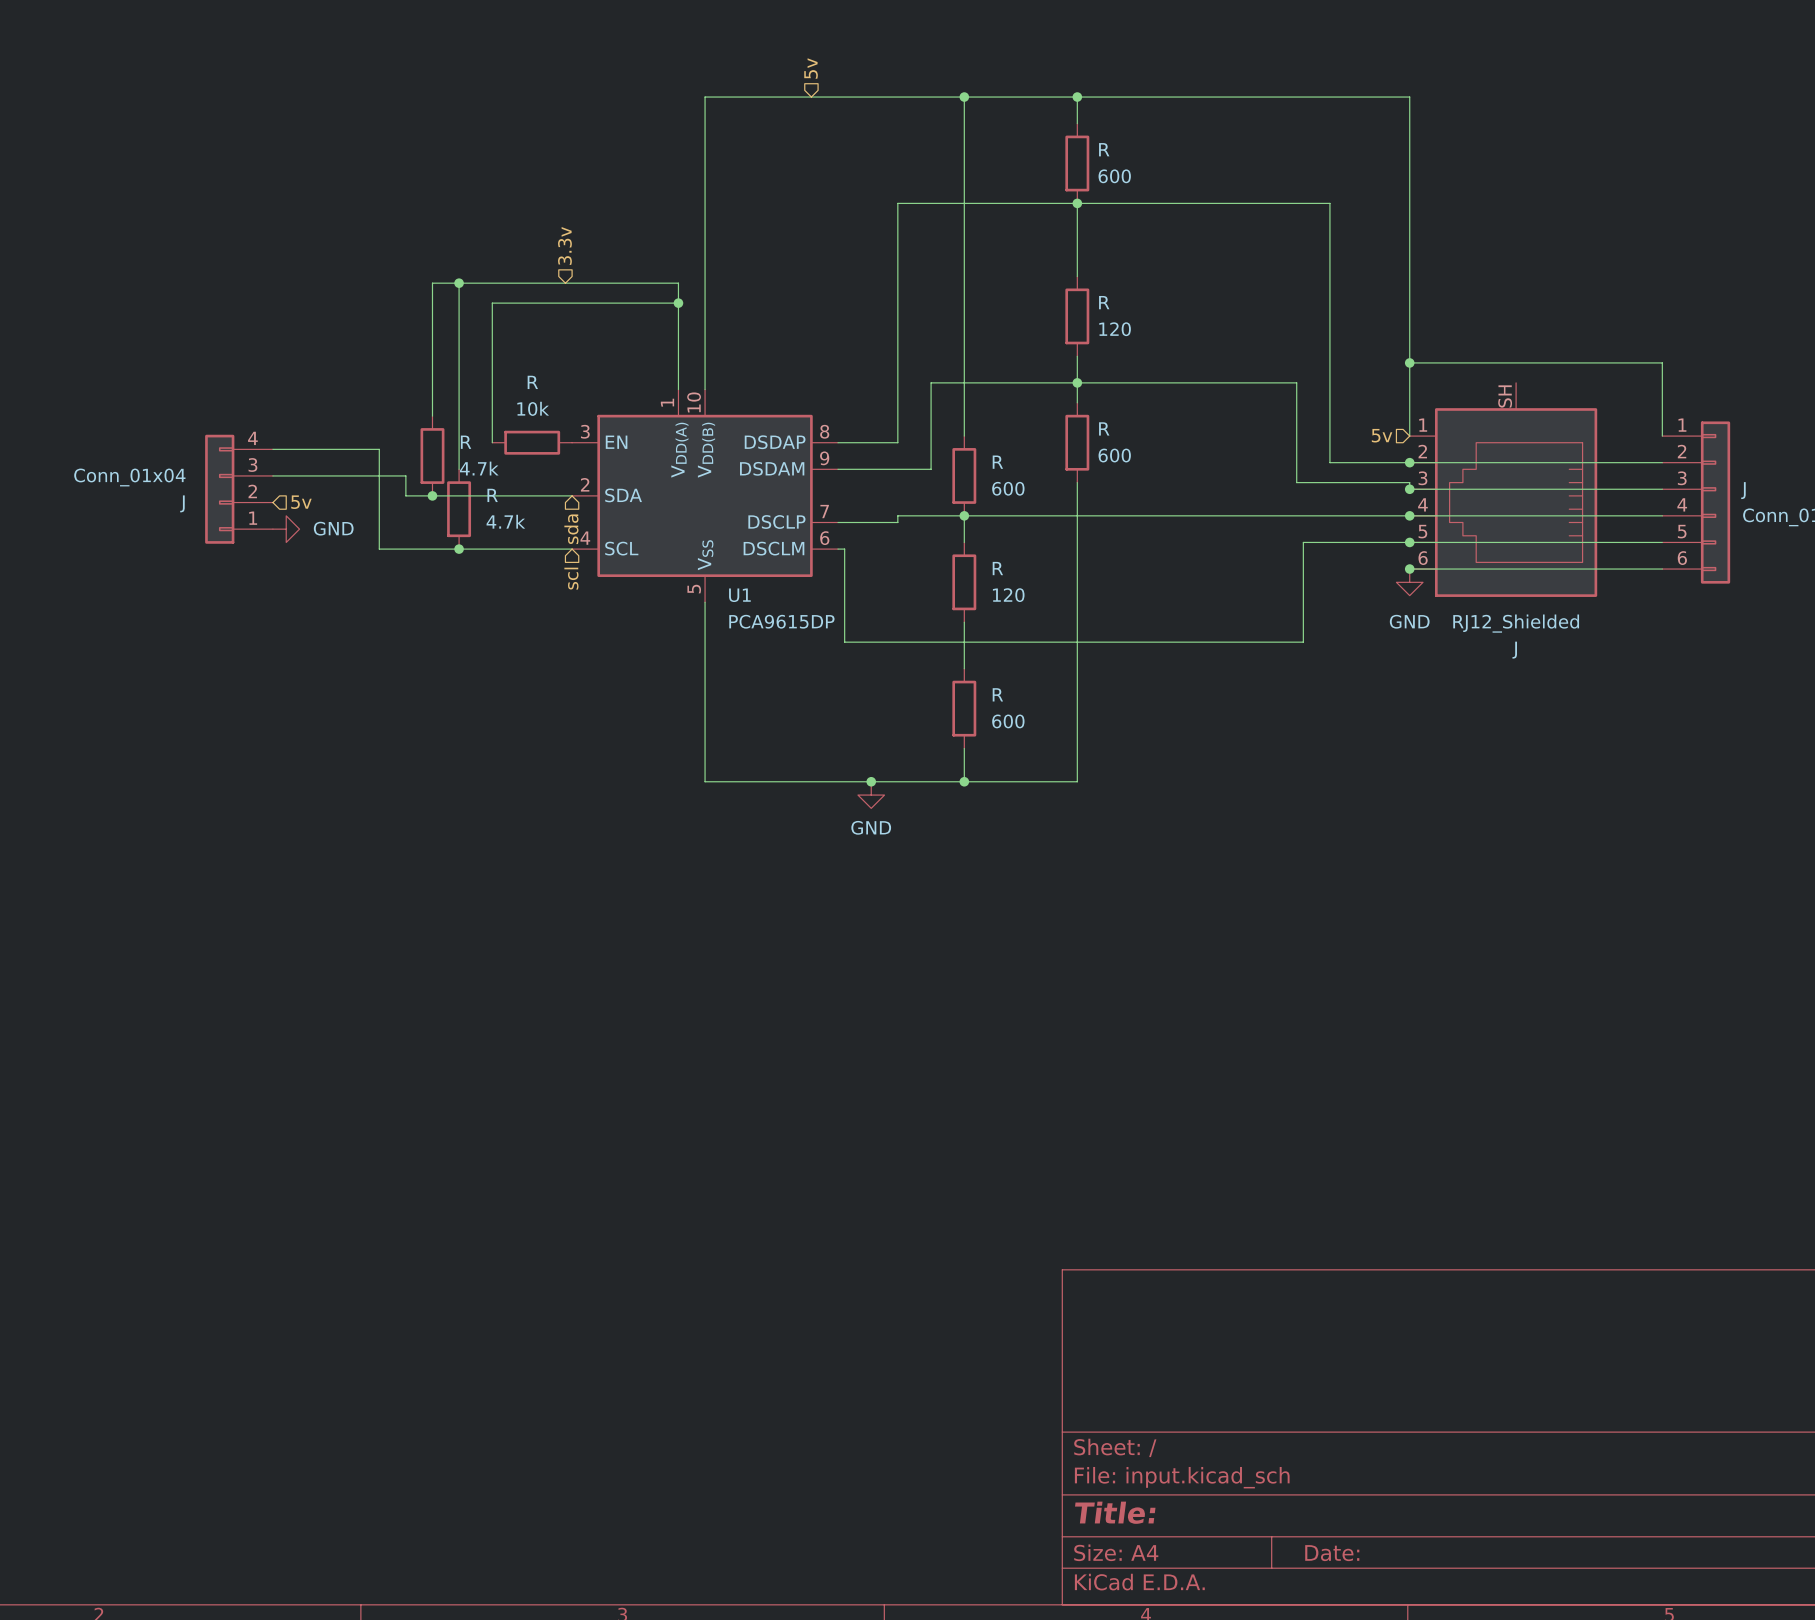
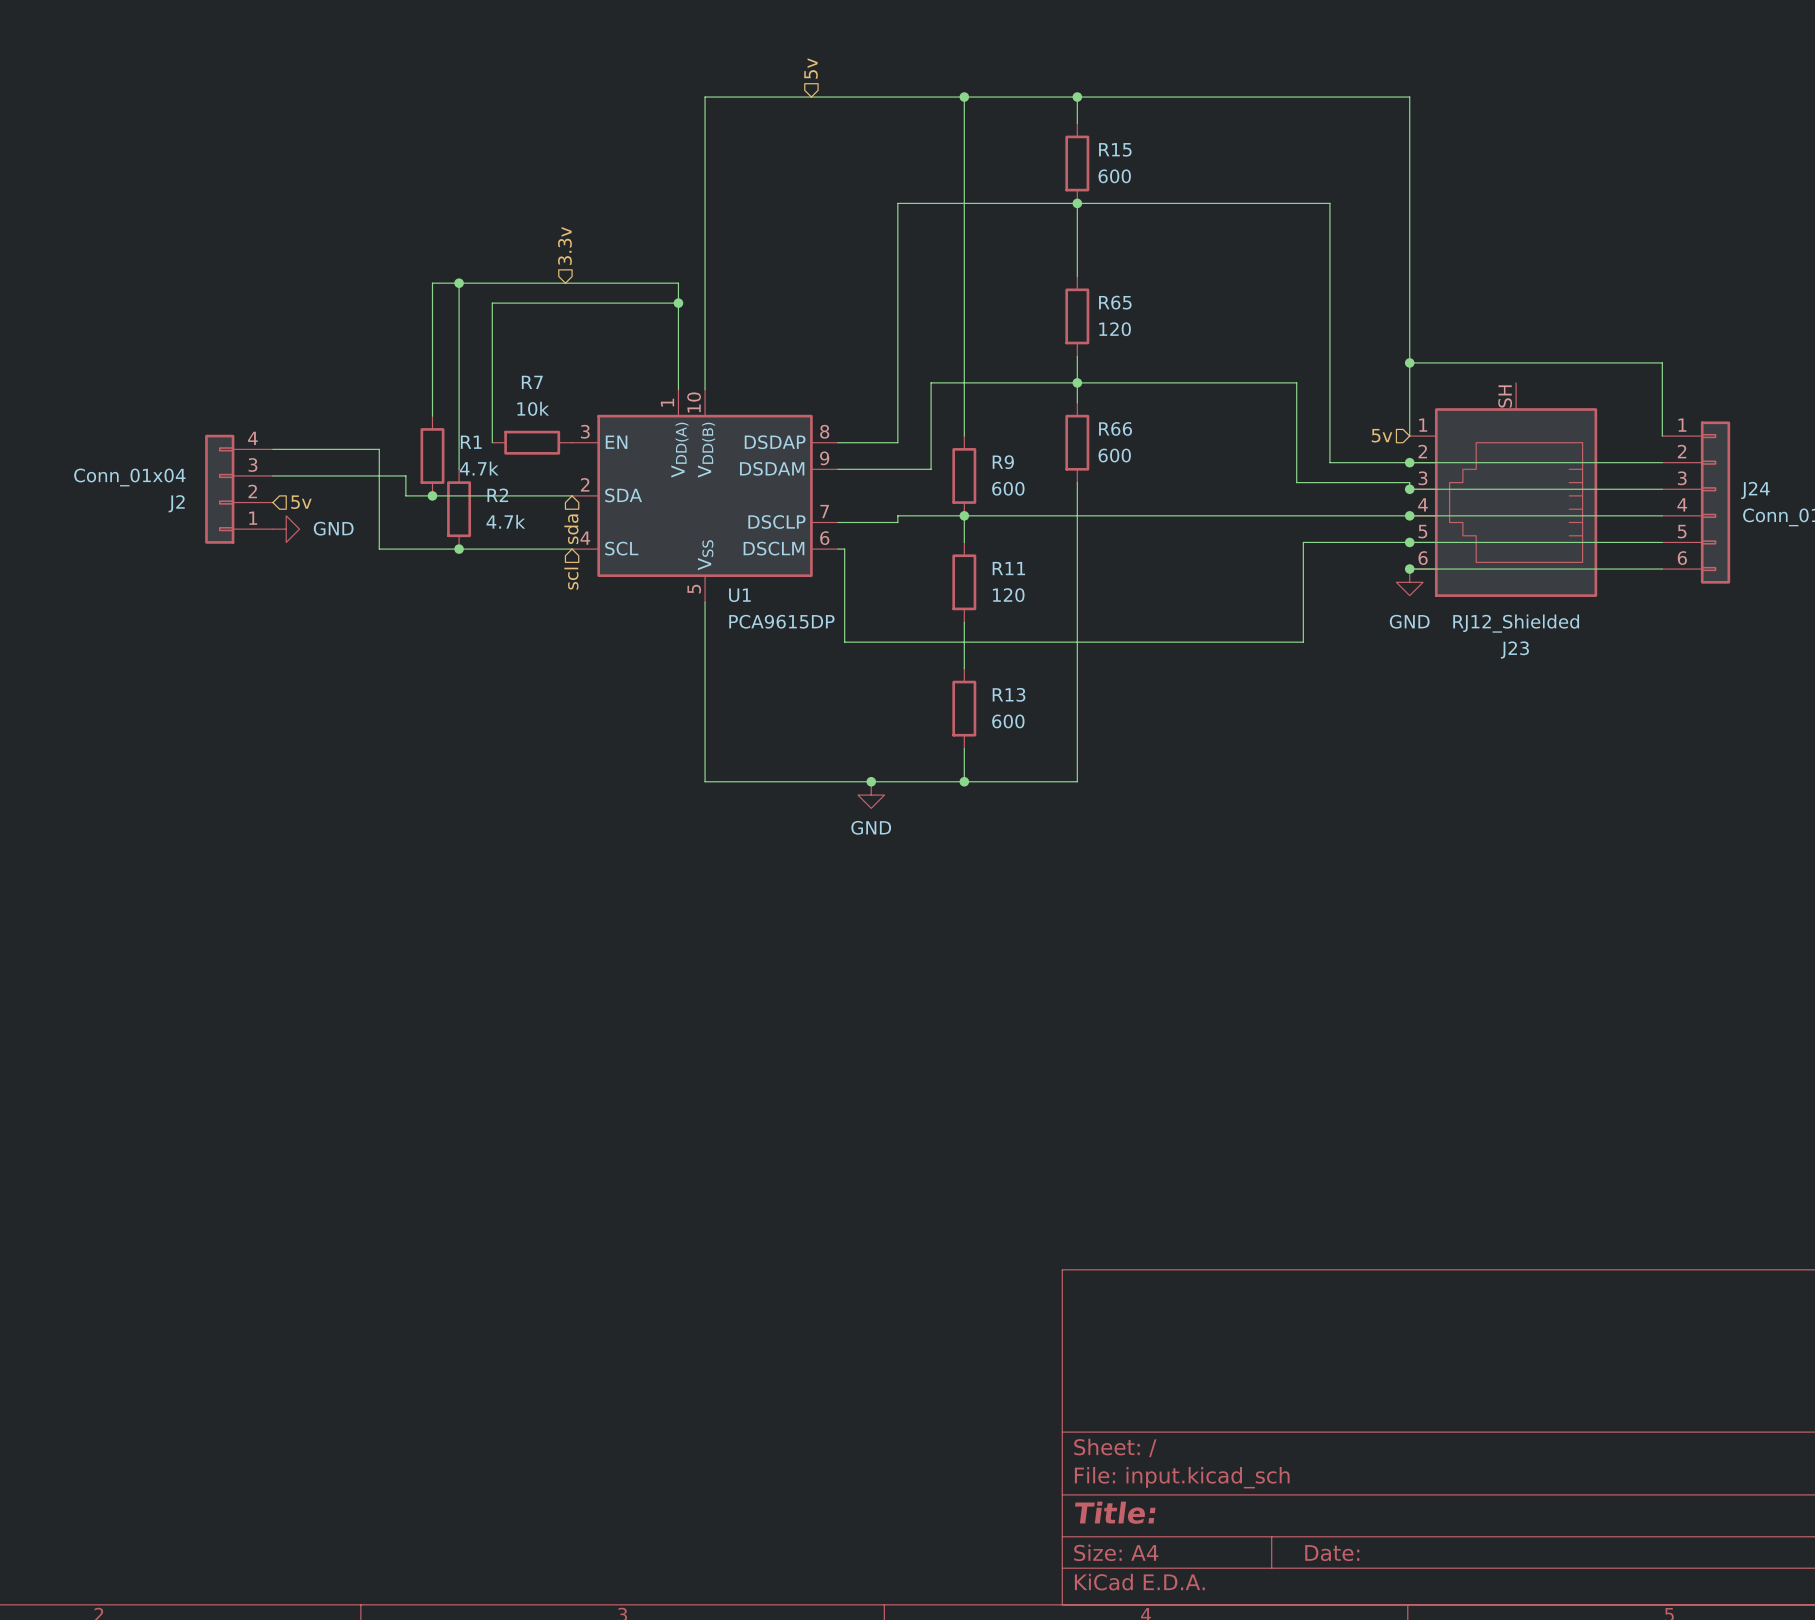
R name: R (1104, 149) -> R15 (1115, 149)
R name: R (1104, 302) -> R65 (1115, 302)
R name: R (532, 382) -> R7 (532, 382)
R name: R (1104, 428) -> R66 (1115, 428)
R name: R (466, 442) -> R1 (471, 442)
R name: R (997, 462) -> R9 (1003, 462)
J name: J (1743, 490) -> J24 (1755, 490)
R name: R (492, 495) -> R2 (497, 495)
J name: J (182, 503) -> J2 (176, 503)
R name: R (997, 568) -> R11 (1008, 568)
J name: J (1514, 650) -> J23 (1514, 650)
R name: R (997, 694) -> R13 (1009, 694)

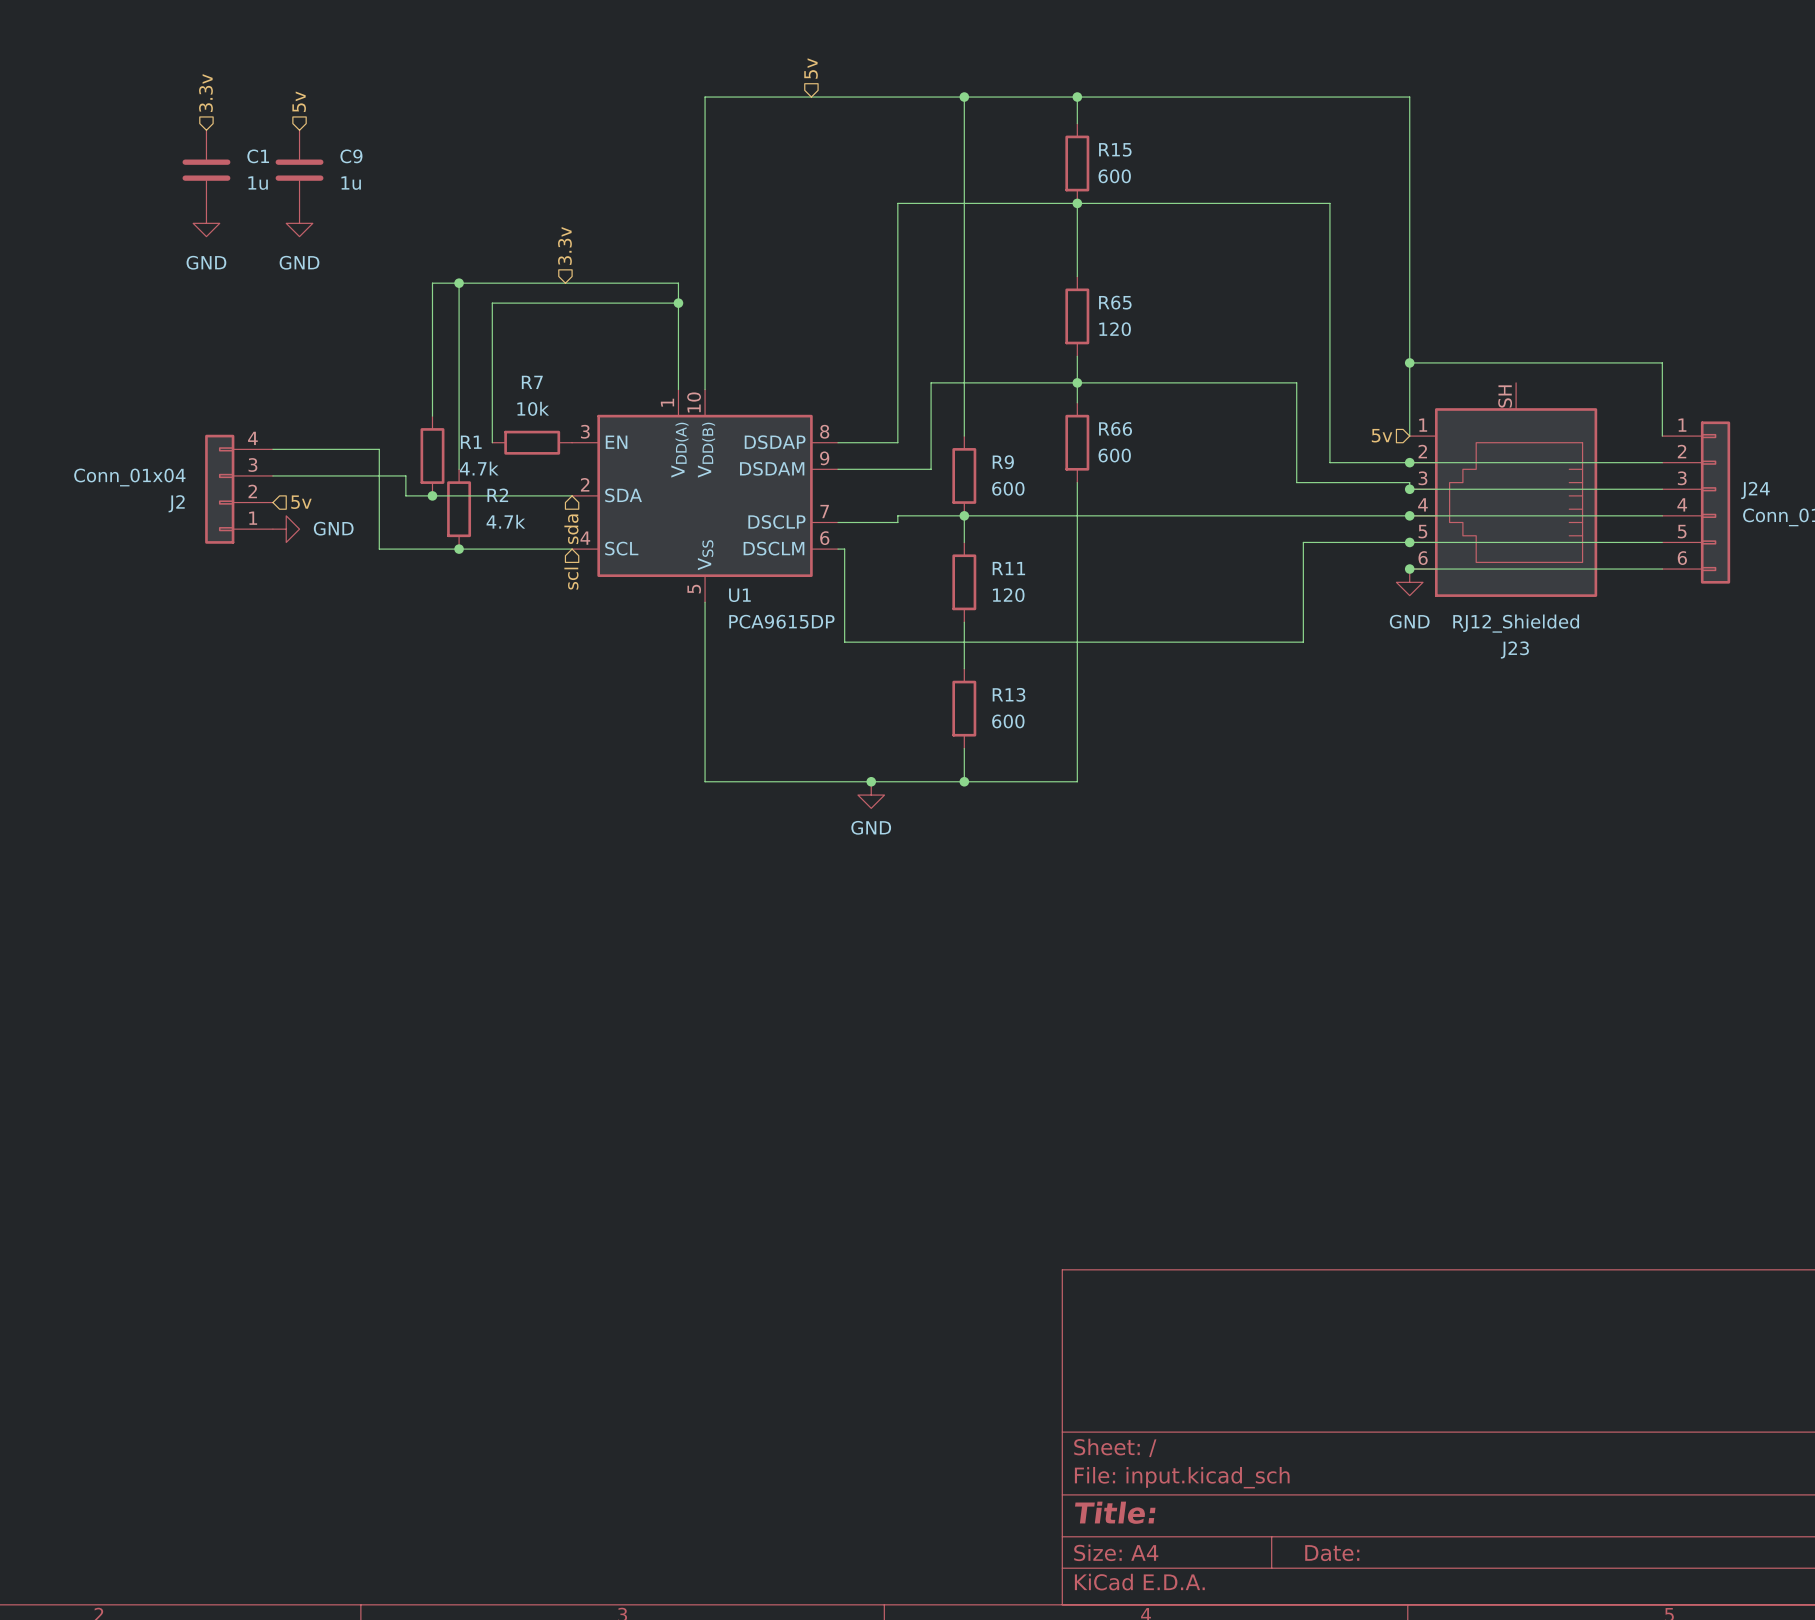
hierarchical label: none -> 3.3v (205, 93)
hierarchical label: none -> 5v (299, 101)
C1: none -> 1u (206, 170)
C9: none -> 1u (299, 170)
power symbol: none -> GND (206, 223)
power symbol: none -> GND (299, 223)

